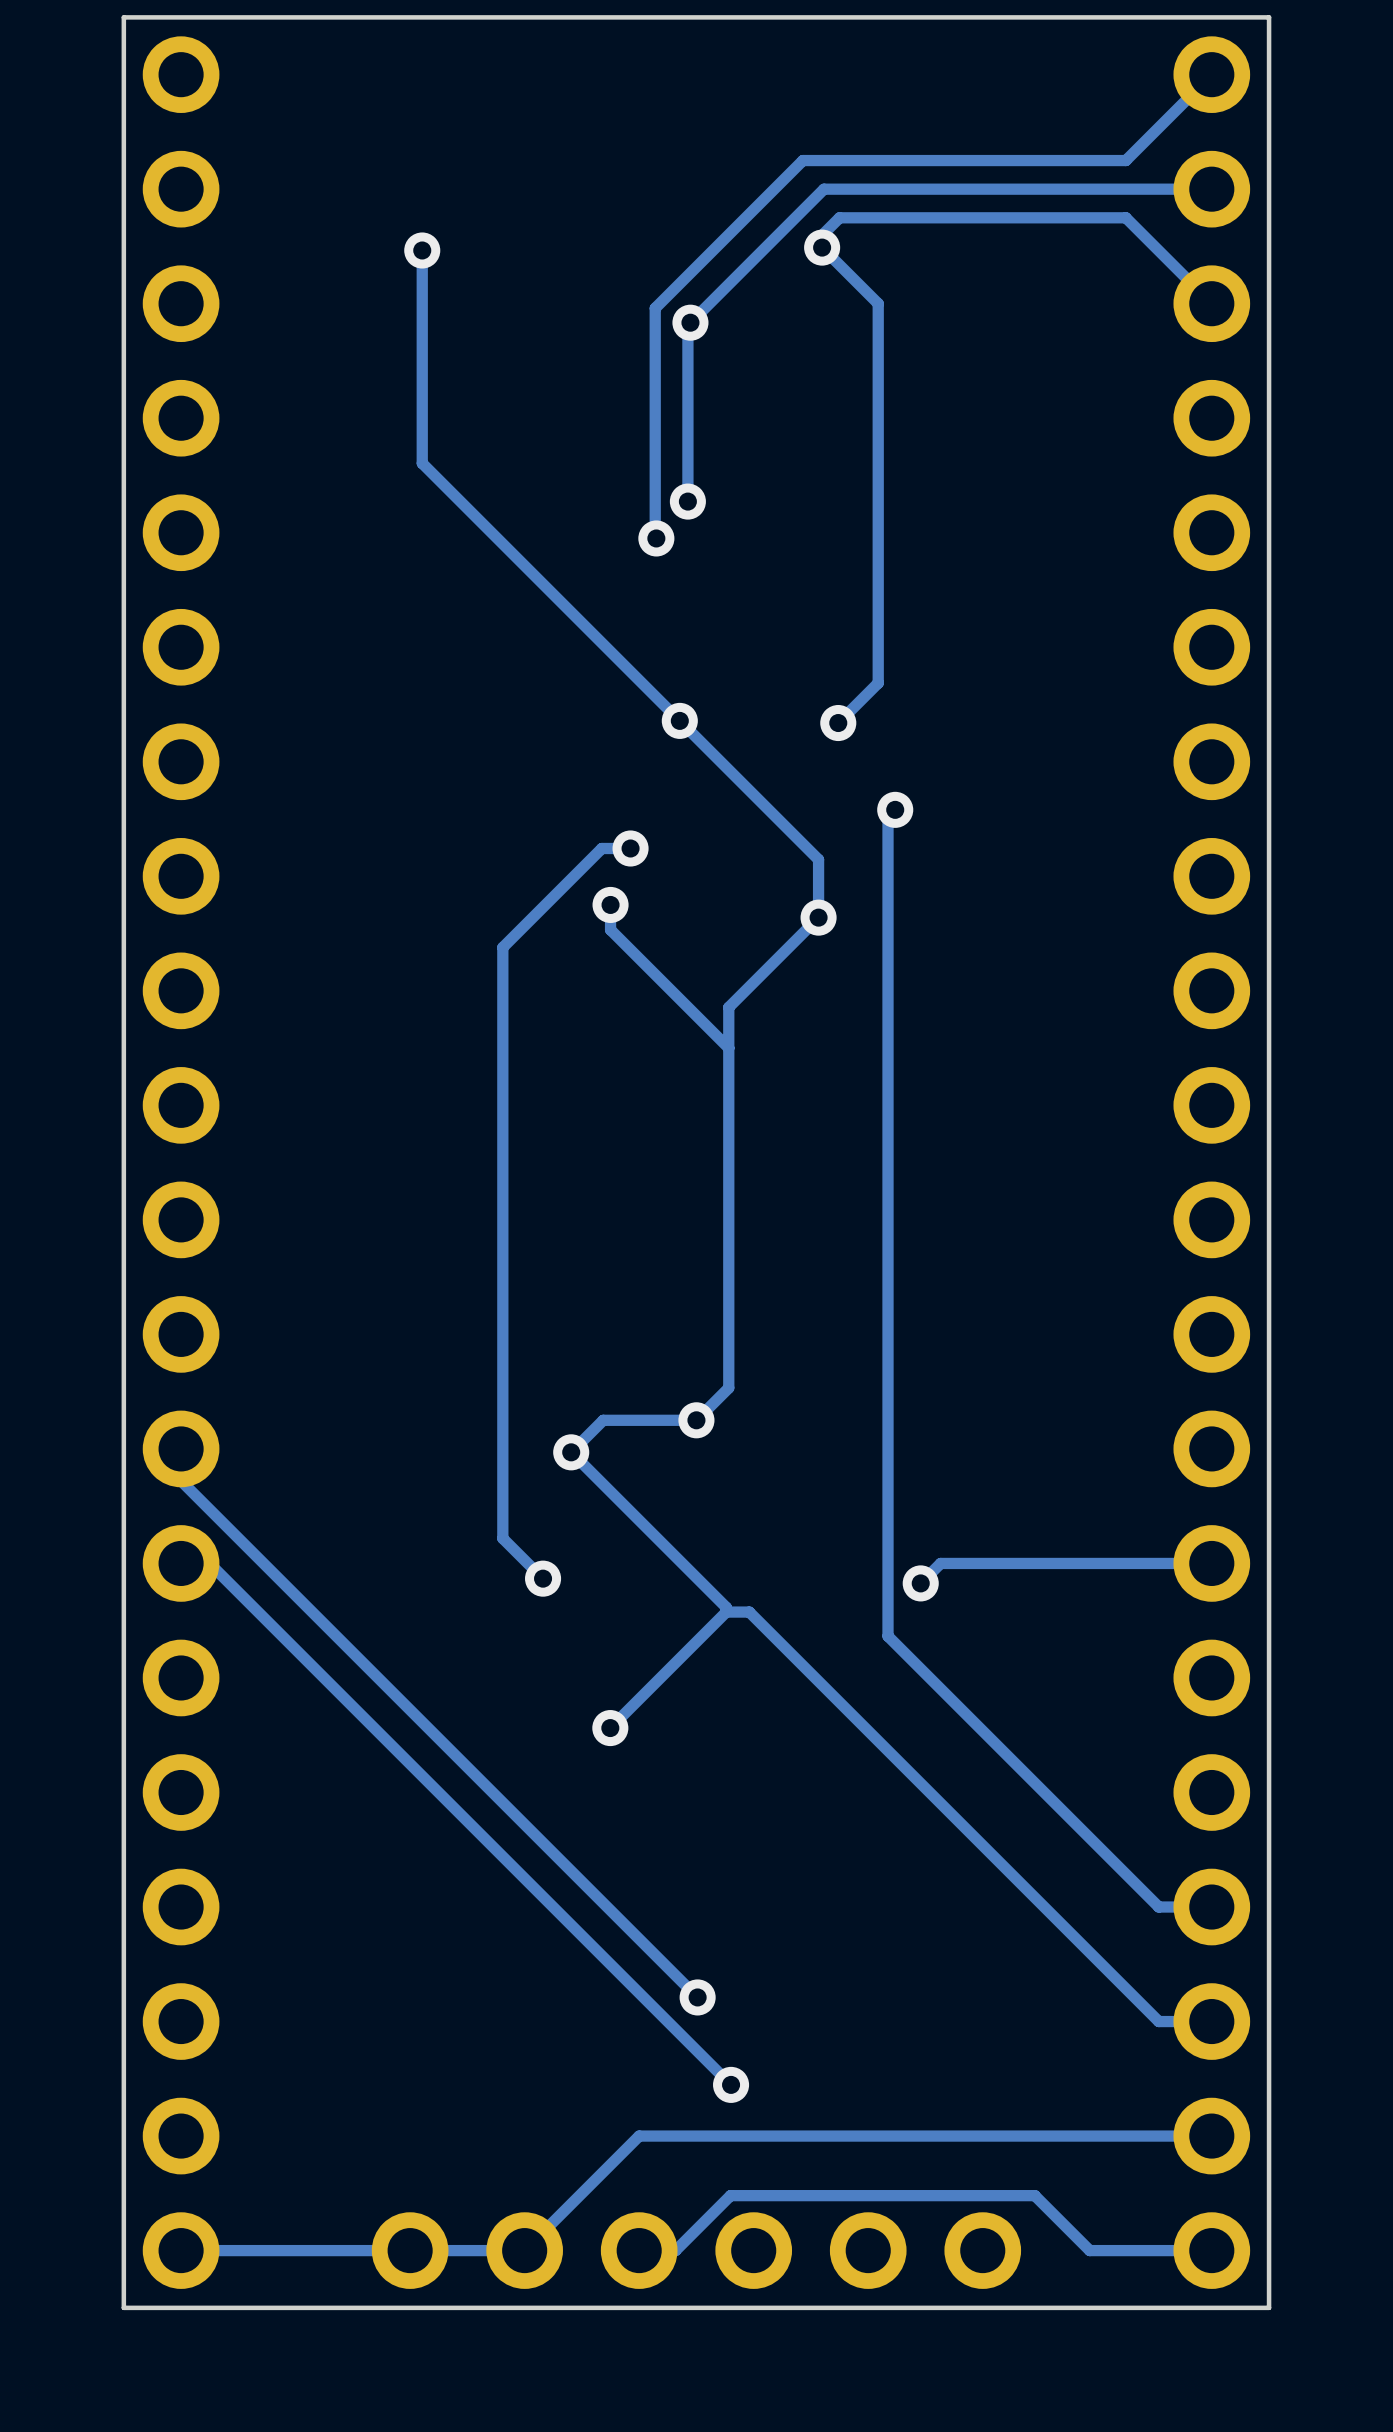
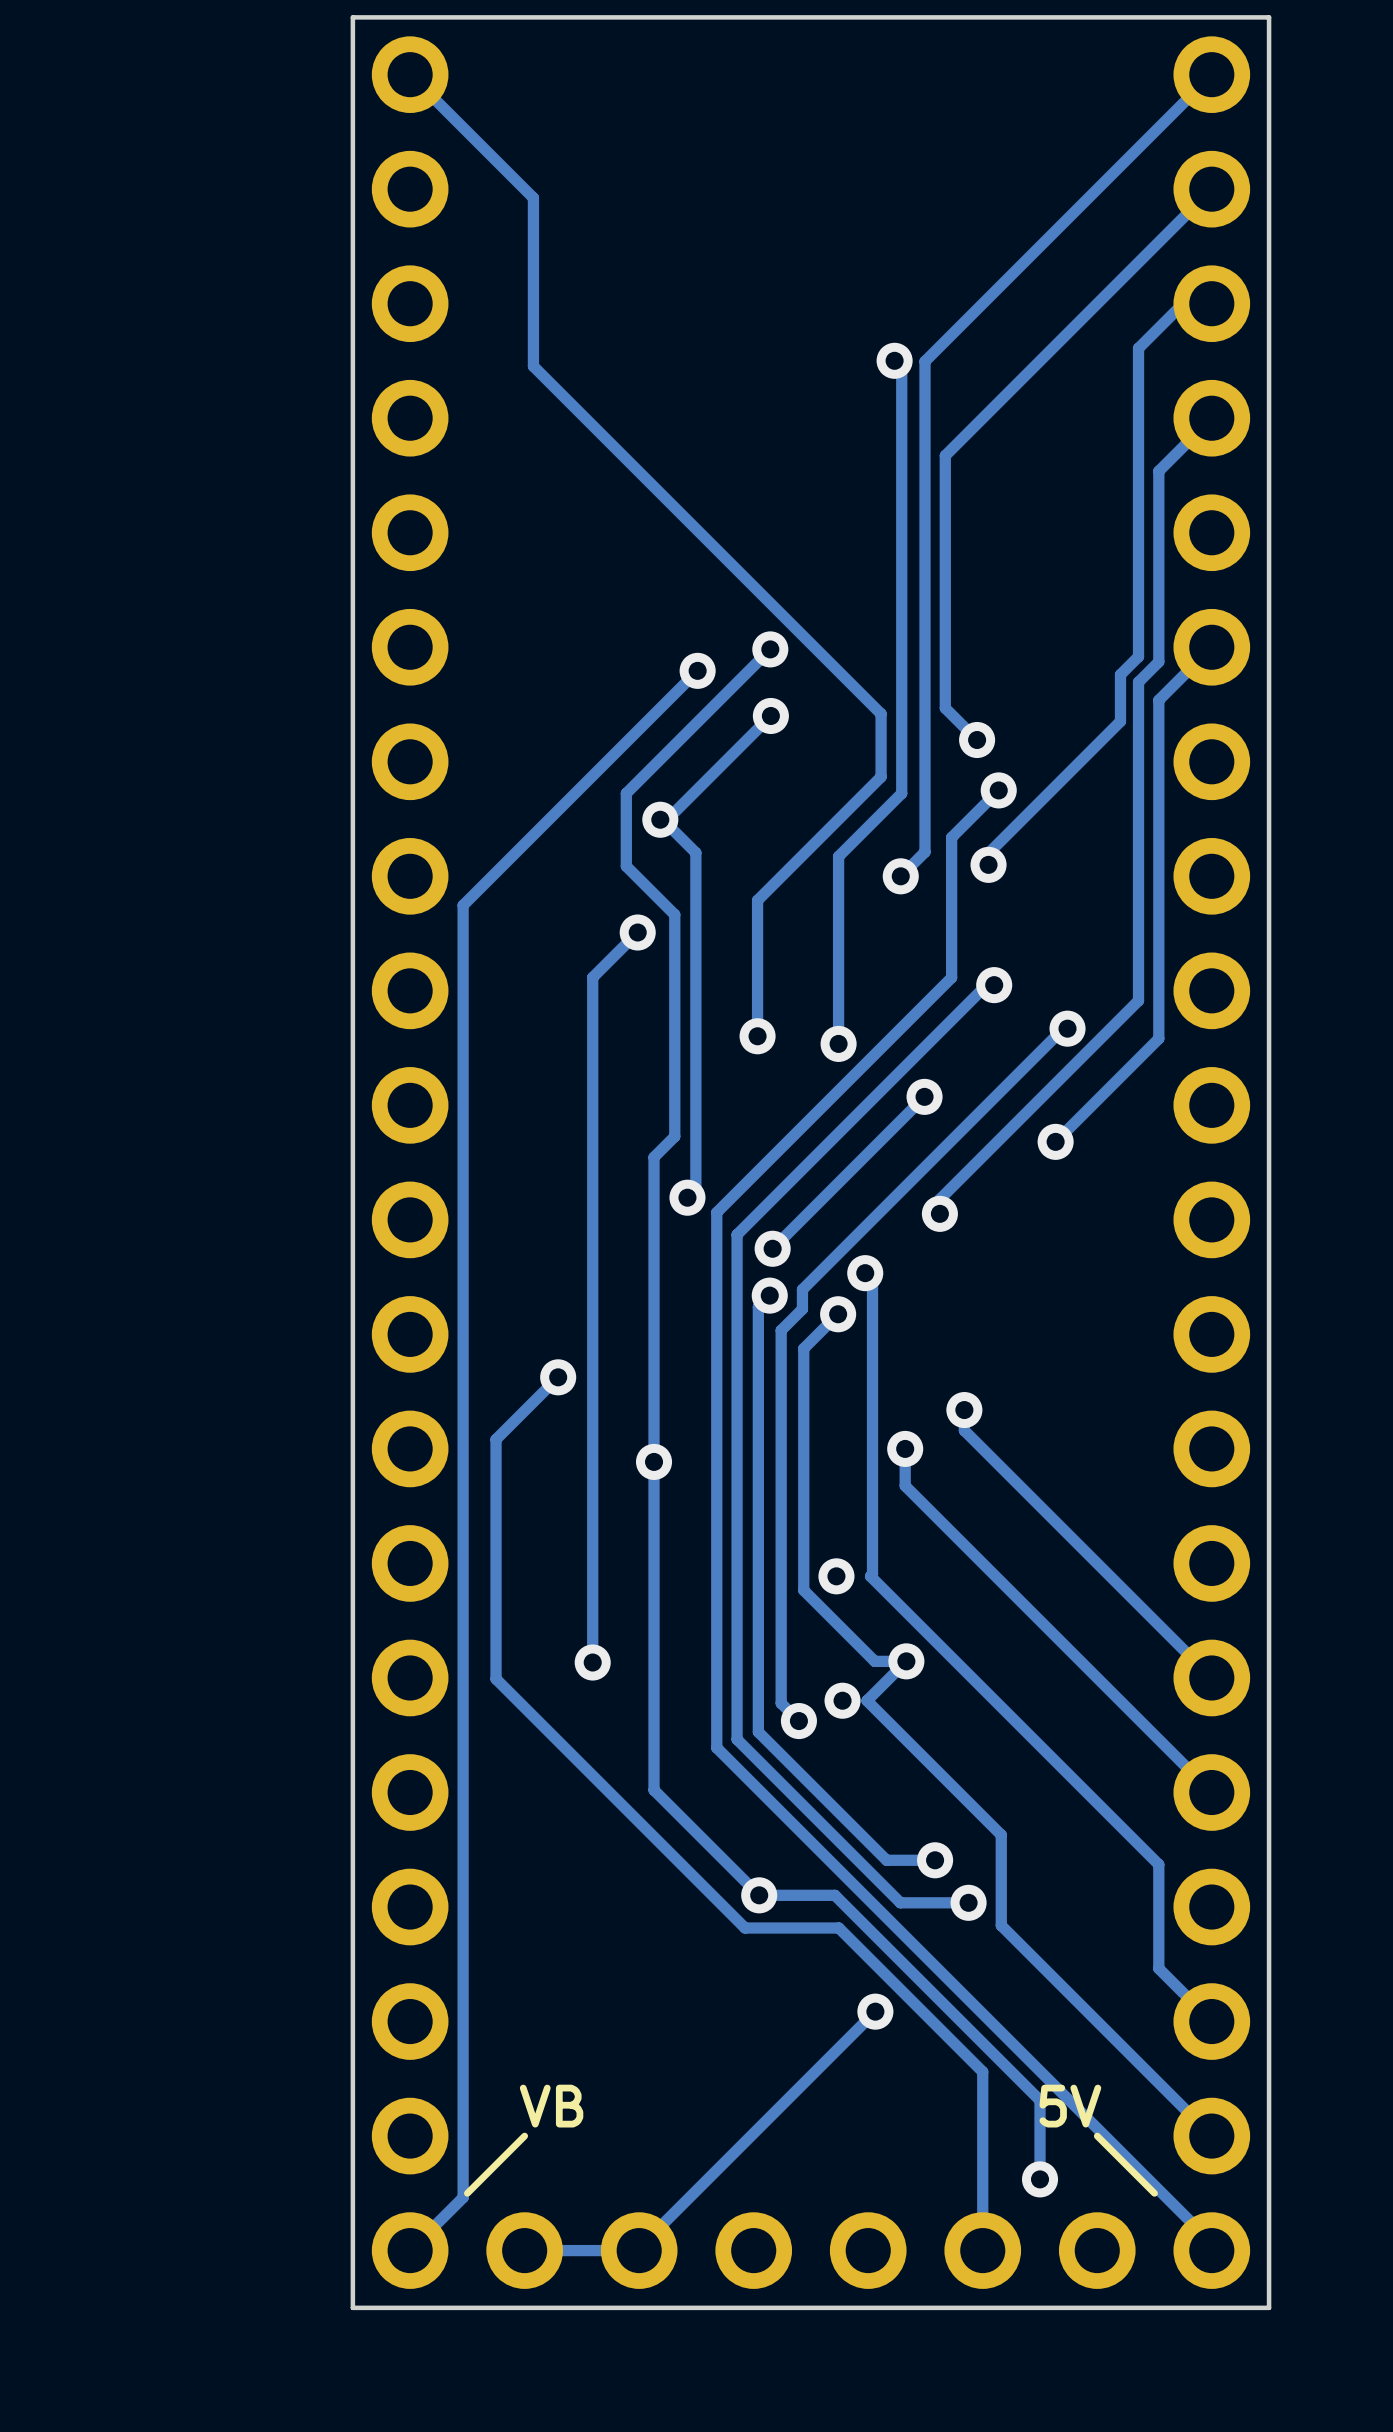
board edge: (352, 17) (123, 17) (123, 2307) (352, 2307) -> (352, 17) (352, 2307)
track: none -> (410, 74) (533, 197) (533, 366) (881, 713) (881, 776) (757, 900) (757, 1036)
track: (1125, 160) (802, 160) (655, 308) (656, 538) -> (1125, 160) (925, 361) (925, 852) (900, 876)
track: (1211, 189) (823, 189) (687, 325) (687, 501) -> (1211, 189) (945, 455) (945, 708) (977, 740)
via: (822, 247) -> none
track: (422, 250) (422, 463) (818, 859) (818, 917) (728, 1007) (728, 1387) (696, 1420) (603, 1420) (571, 1452) (726, 1607) (726, 1612) -> none
via: (422, 250) -> none
track: (1211, 303) (1125, 217) (839, 217) (822, 235) (822, 247) (878, 303) (878, 683) (838, 723) -> (1211, 303) (1183, 303) (1138, 348) (1138, 656) (1120, 674) (1120, 721) (988, 853) (988, 864)
via: (690, 322) -> none
track: none -> (894, 360) (901, 367) (901, 793) (838, 856) (838, 1043)
via: none -> (894, 360)
track: none -> (1211, 418) (1158, 471) (1158, 661) (1138, 682) (1138, 1000) (939, 1199) (939, 1213)
via: (687, 501) -> none
via: (656, 538) -> none
track: none -> (1211, 647) (1158, 700) (1158, 1038) (1055, 1141)
track: none -> (770, 649) (626, 793) (626, 866) (674, 914) (674, 1136) (654, 1157) (654, 1790) (759, 1895) (834, 1895) (1040, 2100) (1040, 2179)
via: none -> (770, 649)
track: none -> (697, 670) (463, 905) (463, 2197) (410, 2250)
via: none -> (697, 670)
track: none -> (770, 715) (667, 819) (660, 819)
via: none -> (770, 715)
via: (679, 720) -> none
via: (838, 723) -> none
via: none -> (977, 740)
via: none -> (998, 790)
track: (895, 809) (888, 817) (888, 1636) (1158, 1907) (1211, 1907) -> none
via: (895, 809) -> none
track: none -> (662, 819) (695, 852) (695, 1189) (687, 1197)
track: (630, 848) (601, 848) (502, 947) (502, 1538) (543, 1578) -> none
via position: (630, 848) -> (660, 819)
via: none -> (988, 864)
via: none -> (900, 876)
track: (610, 904) (610, 929) (728, 1048) -> none
via position: (610, 904) -> (637, 932)
via: (818, 917) -> none
track: none -> (637, 932) (592, 977) (592, 1662)
track: none -> (994, 985) (986, 985) (737, 1234) (737, 1739) (900, 1902) (968, 1902)
via: none -> (994, 985)
track: none -> (1067, 1028) (1063, 1028) (802, 1289) (802, 1309) (781, 1330) (781, 1703) (798, 1721)
via: none -> (1067, 1028)
via: none -> (757, 1036)
via: none -> (838, 1043)
track: none -> (924, 1096) (772, 1248)
via: none -> (924, 1096)
via: none -> (1055, 1141)
part position: (181, 1162) -> (410, 1162)
via: none -> (687, 1197)
via: none -> (939, 1213)
via: none -> (772, 1248)
via: none -> (865, 1273)
track: none -> (769, 1295) (758, 1307) (758, 1732) (886, 1860) (935, 1860)
via: none -> (769, 1295)
via: none -> (838, 1314)
track: none -> (558, 1377) (496, 1439) (496, 1679) (745, 1928) (838, 1928) (982, 2071) (982, 2250)
via: none -> (558, 1377)
track: none -> (964, 1410) (964, 1430) (1211, 1677)
via: none -> (964, 1410)
via: (696, 1420) -> none
track: (181, 1448) (181, 1480) (697, 1997) -> none
track: none -> (905, 1448) (905, 1485) (1211, 1792)
via: none -> (905, 1448)
via: (571, 1452) -> none
via: none -> (654, 1461)
track: (181, 1563) (209, 1563) (731, 2084) -> none
track: (1211, 1563) (940, 1563) (920, 1583) -> none
via: none -> (836, 1576)
via: (543, 1578) -> none
via: (920, 1583) -> none
track: (726, 1612) (749, 1612) (1158, 2021) (1211, 2021) -> (865, 1273) (872, 1280) (872, 1574) (870, 1576) (1158, 1864) (1158, 1968) (1211, 2021)
track: (726, 1612) (610, 1728) -> none
via: none -> (906, 1661)
via: none -> (592, 1662)
via: none -> (842, 1700)
via: none -> (798, 1721)
via: (610, 1728) -> none
via: none -> (935, 1860)
via: none -> (759, 1895)
via: none -> (968, 1902)
via: (697, 1997) -> none
track: none -> (875, 2011) (639, 2247) (639, 2250) (524, 2250)
via: none -> (875, 2011)
via: (731, 2084) -> none
text: none -> VB (551, 2106)
text: none -> 5V (1070, 2106)
line: none -> (524, 2136) (467, 2193)
line: none -> (1097, 2136) (1154, 2193)
track: (1211, 2136) (639, 2136) (524, 2250) (181, 2250) -> (1211, 2136) (1001, 1925) (1001, 1834) (867, 1700) (906, 1661) (874, 1661) (803, 1590) (803, 1348) (838, 1314)
via: none -> (1040, 2179)
part position: (696, 2250) -> (810, 2250)
track: (1211, 2250) (1089, 2250) (1034, 2195) (730, 2195) (675, 2250) (639, 2250) -> (1211, 2250) (1211, 2242) (716, 1747) (716, 1212) (951, 977) (951, 837) (998, 790)

